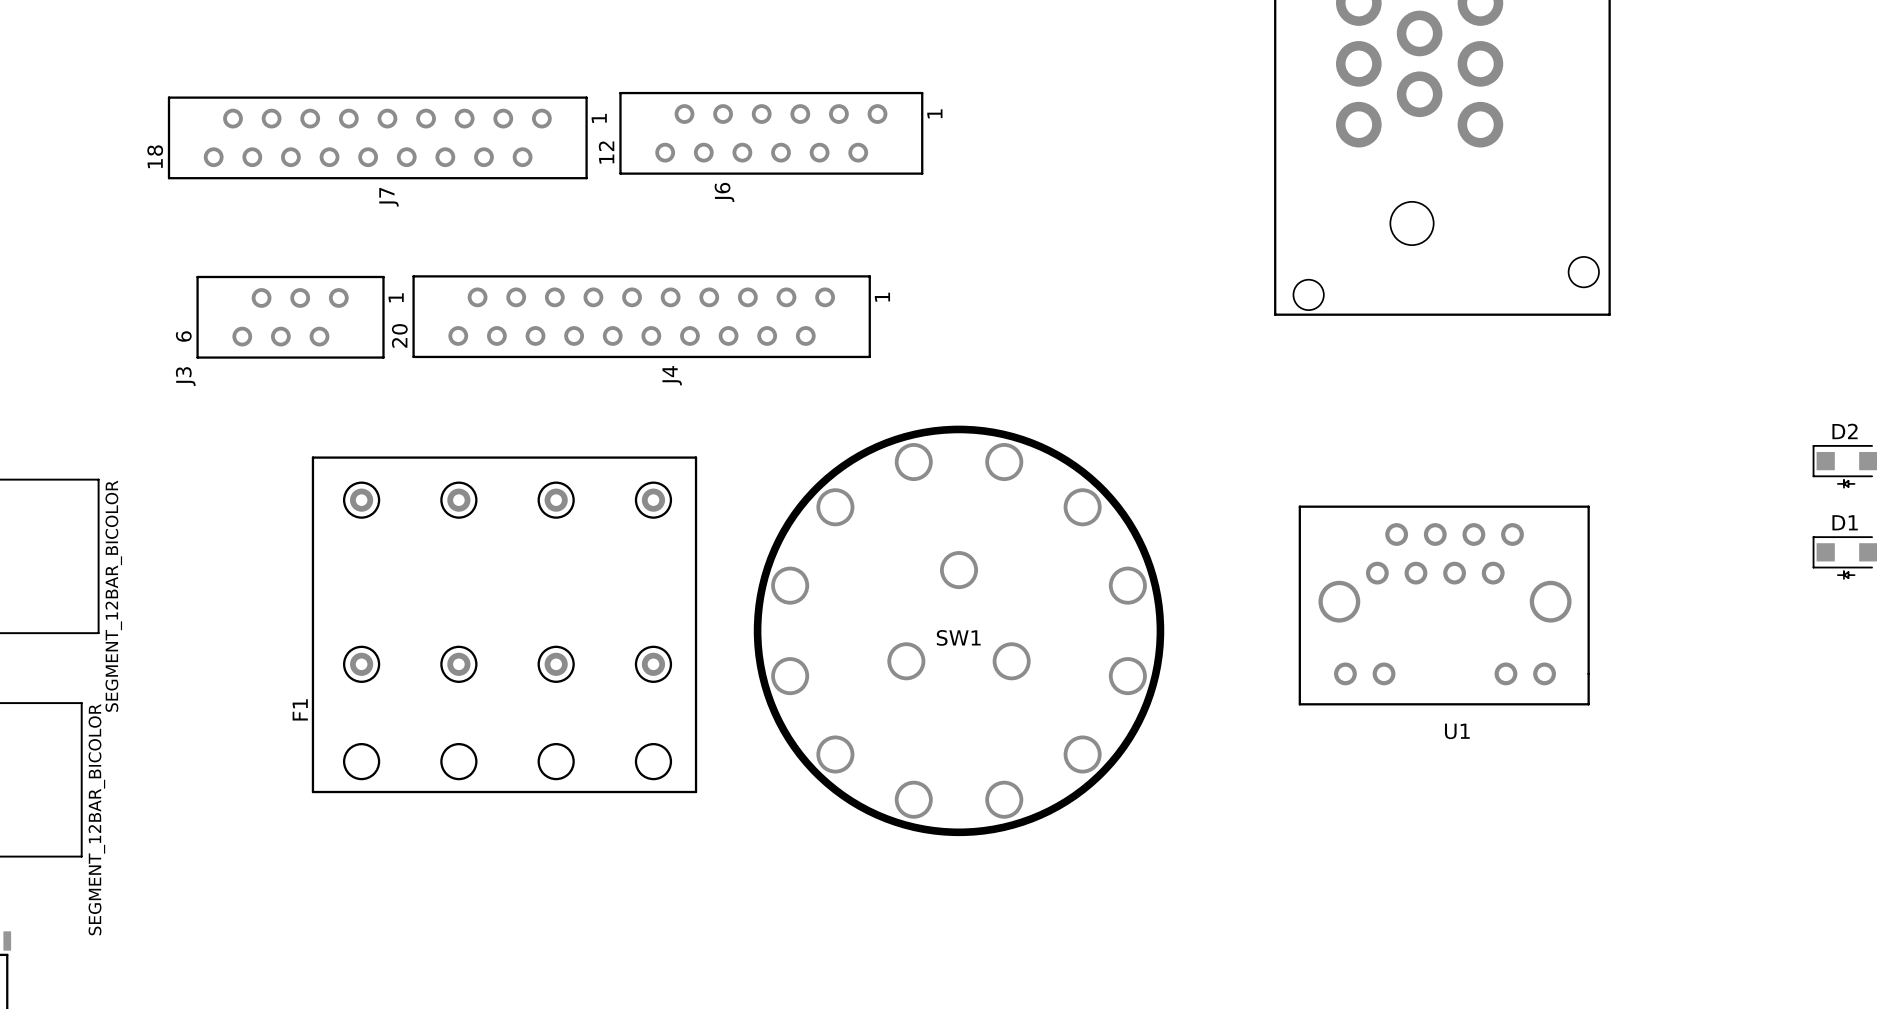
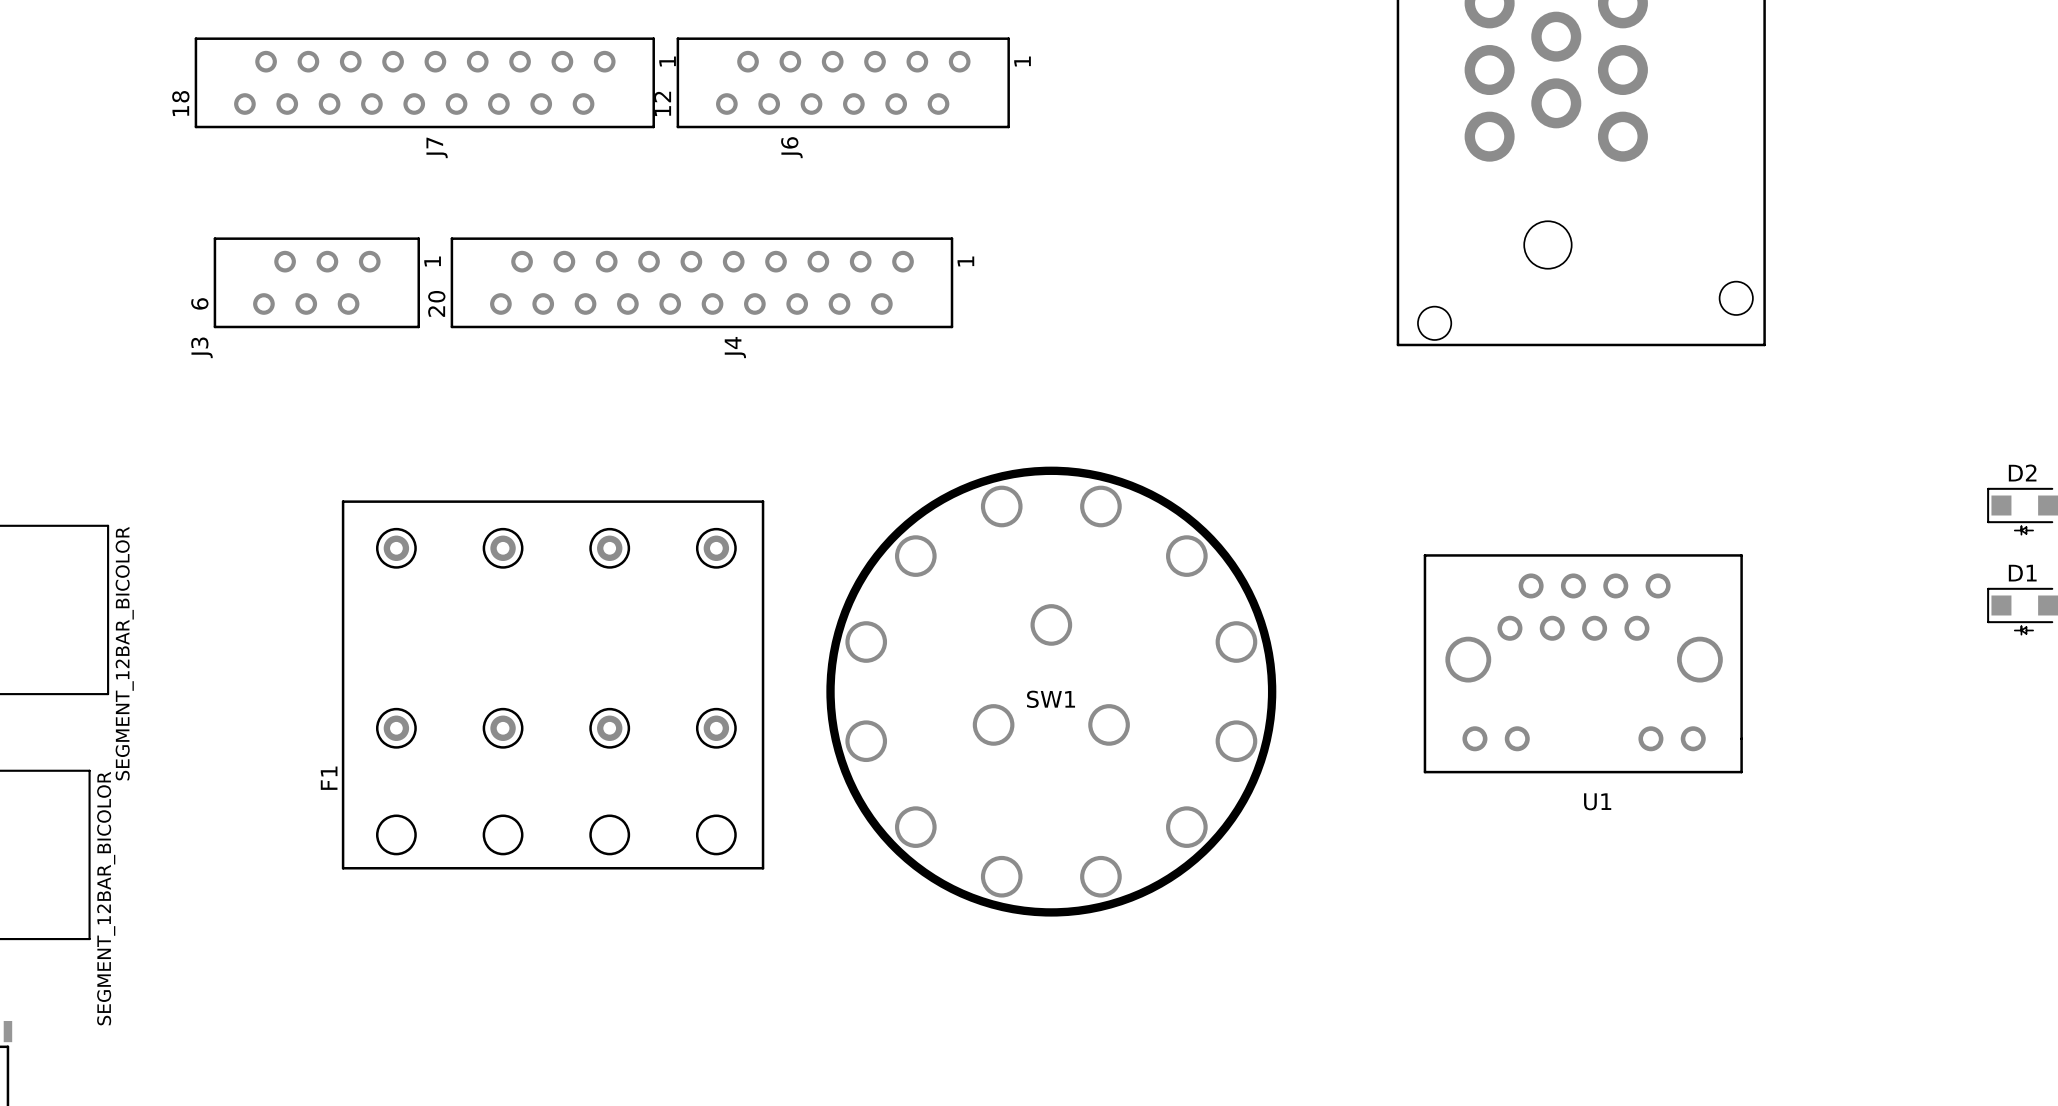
J6 position: (771, 133) -> (843, 82)
J7 position: (377, 137) -> (424, 82)
J4 position: (641, 316) -> (701, 282)
J3 position: (290, 317) -> (316, 282)

